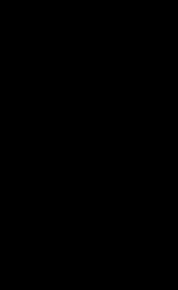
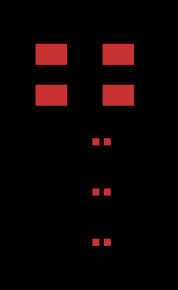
part: none -> (51, 74)
part: none -> (118, 74)
part: none -> (101, 141)
part: none -> (101, 192)
part: none -> (101, 242)

